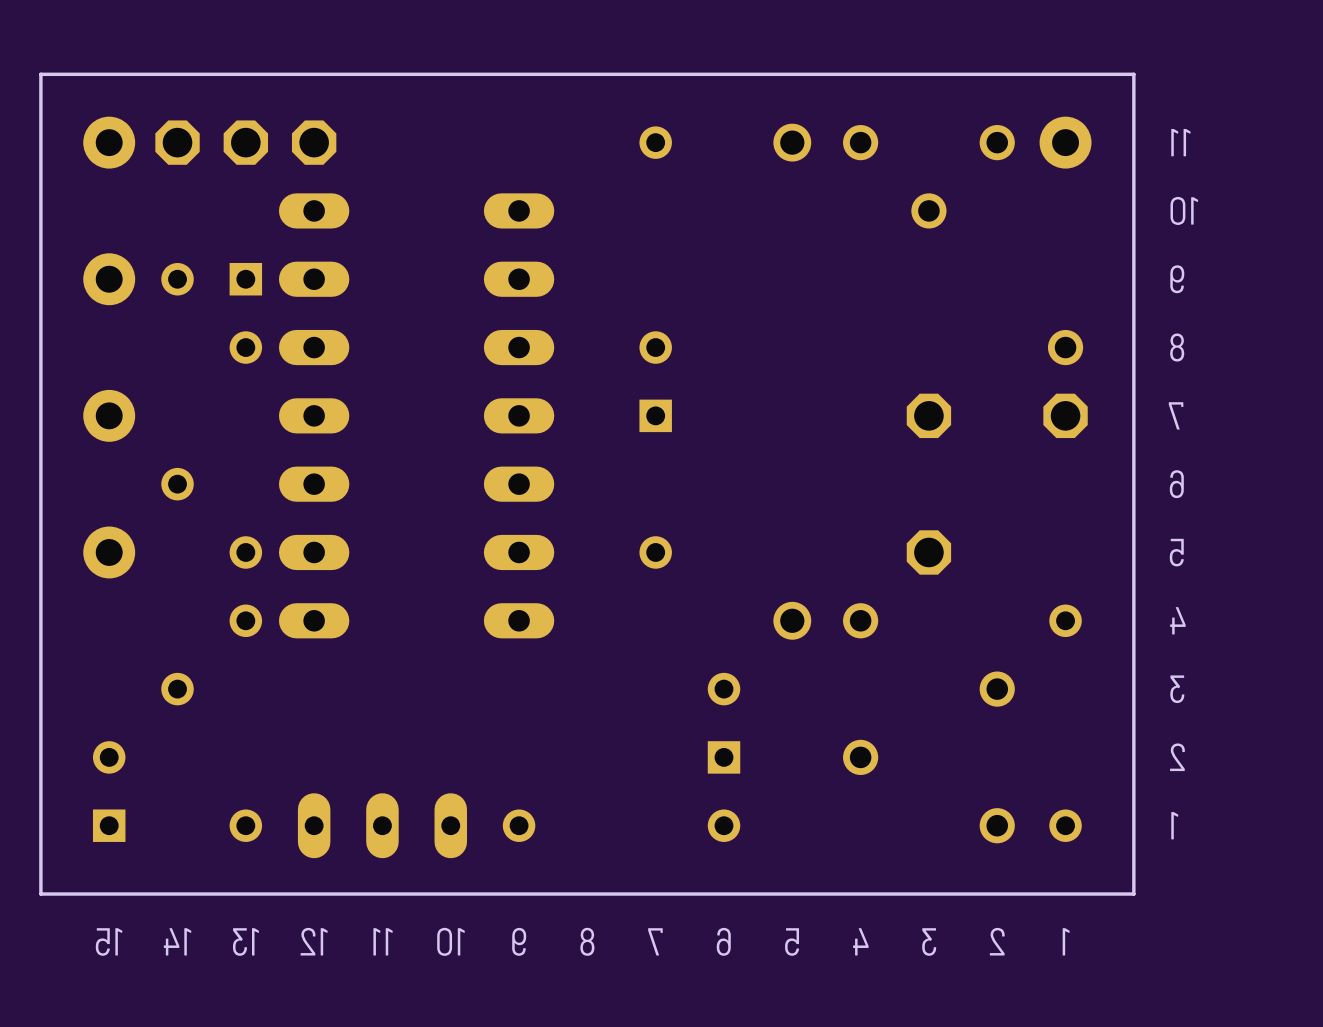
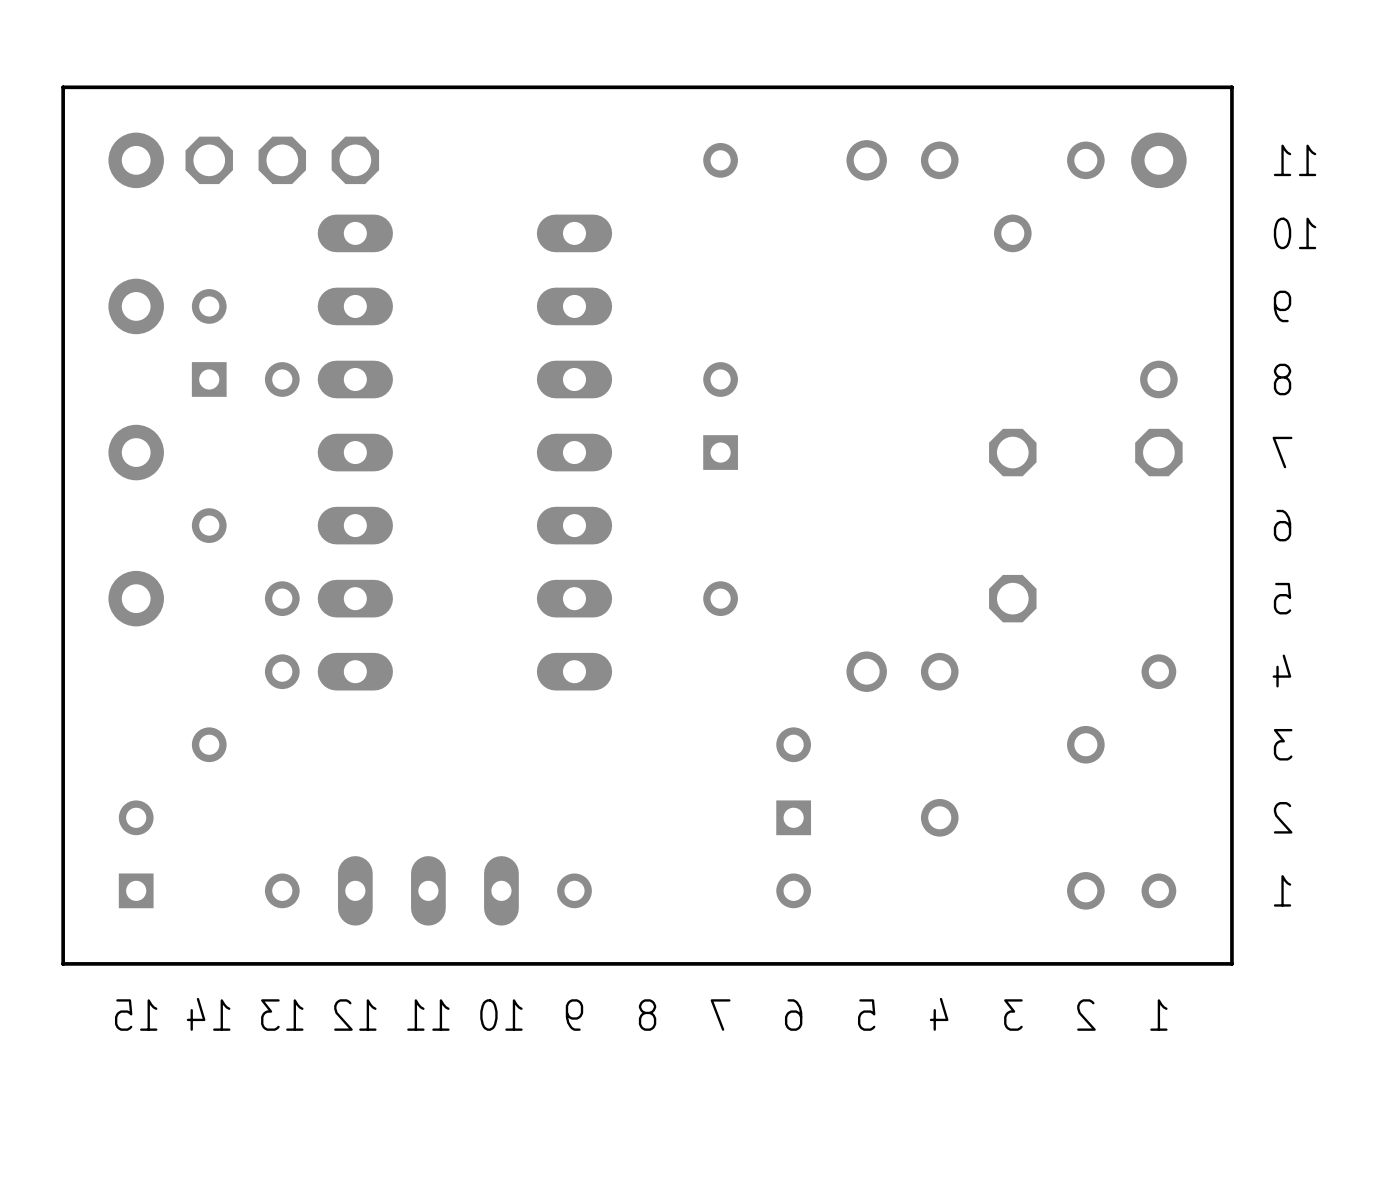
part rotation: 0° (211, 279) -> 90° clockwise (209, 342)

